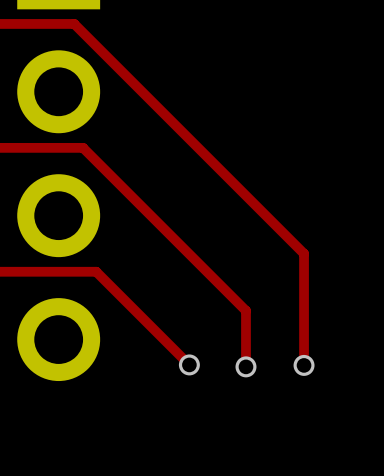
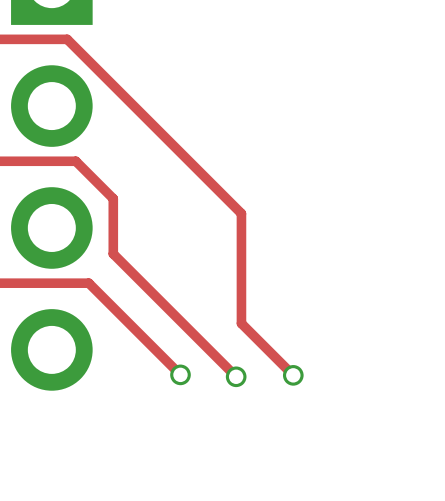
top track: (121, 185) (245, 310) (245, 366) -> (113, 198) (113, 253) (236, 376)
top track: (251, 201) (304, 253) (304, 365) -> (241, 213) (241, 323) (293, 375)

